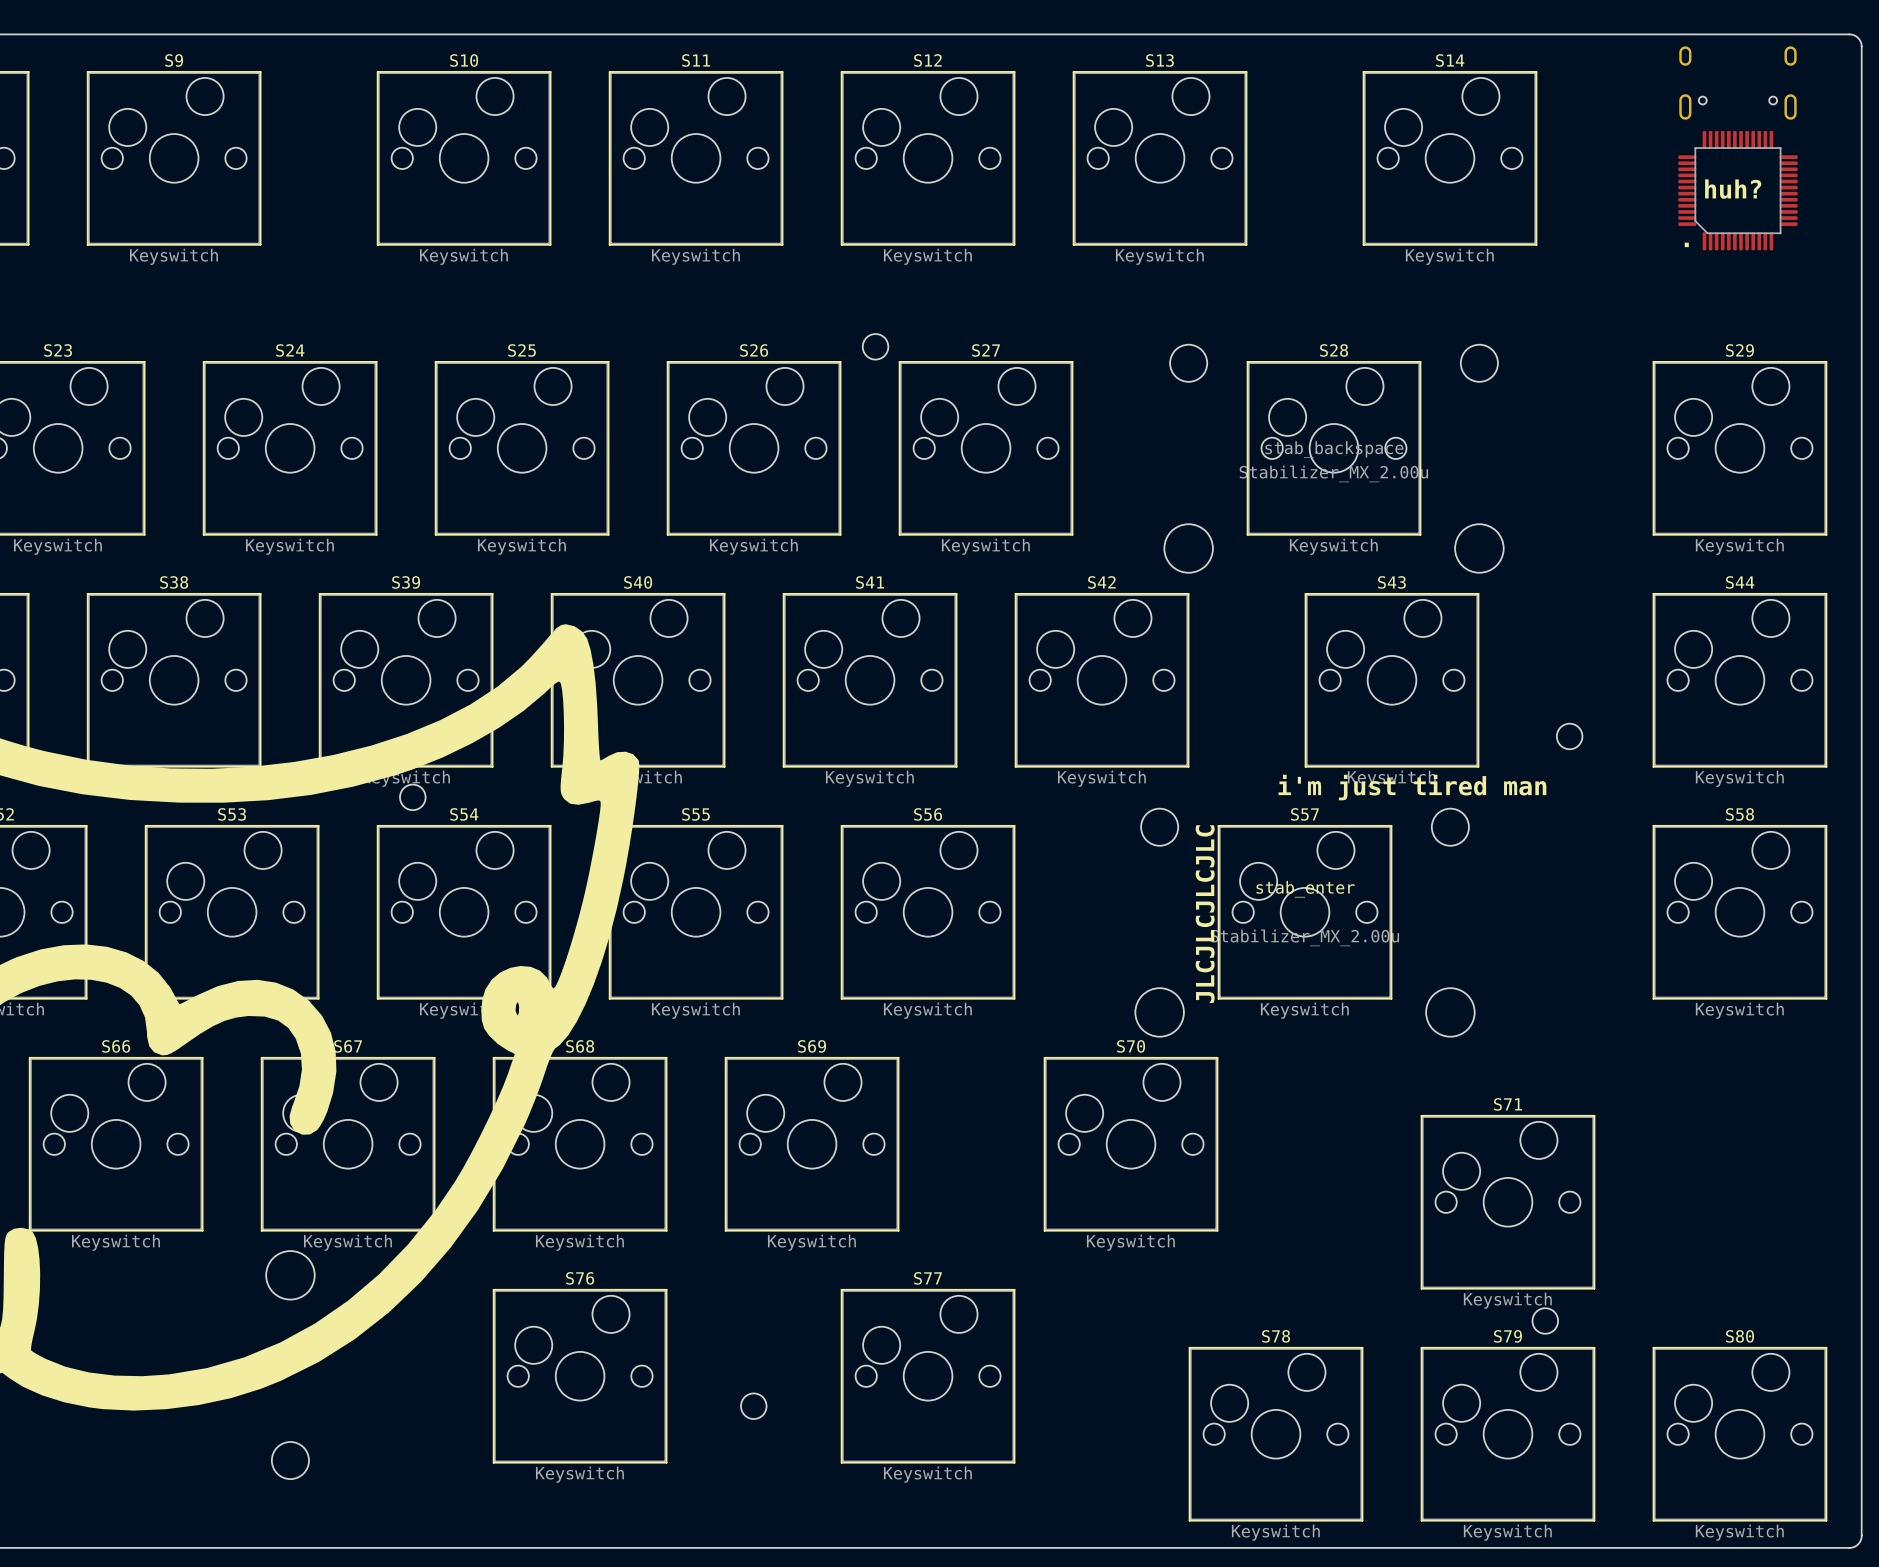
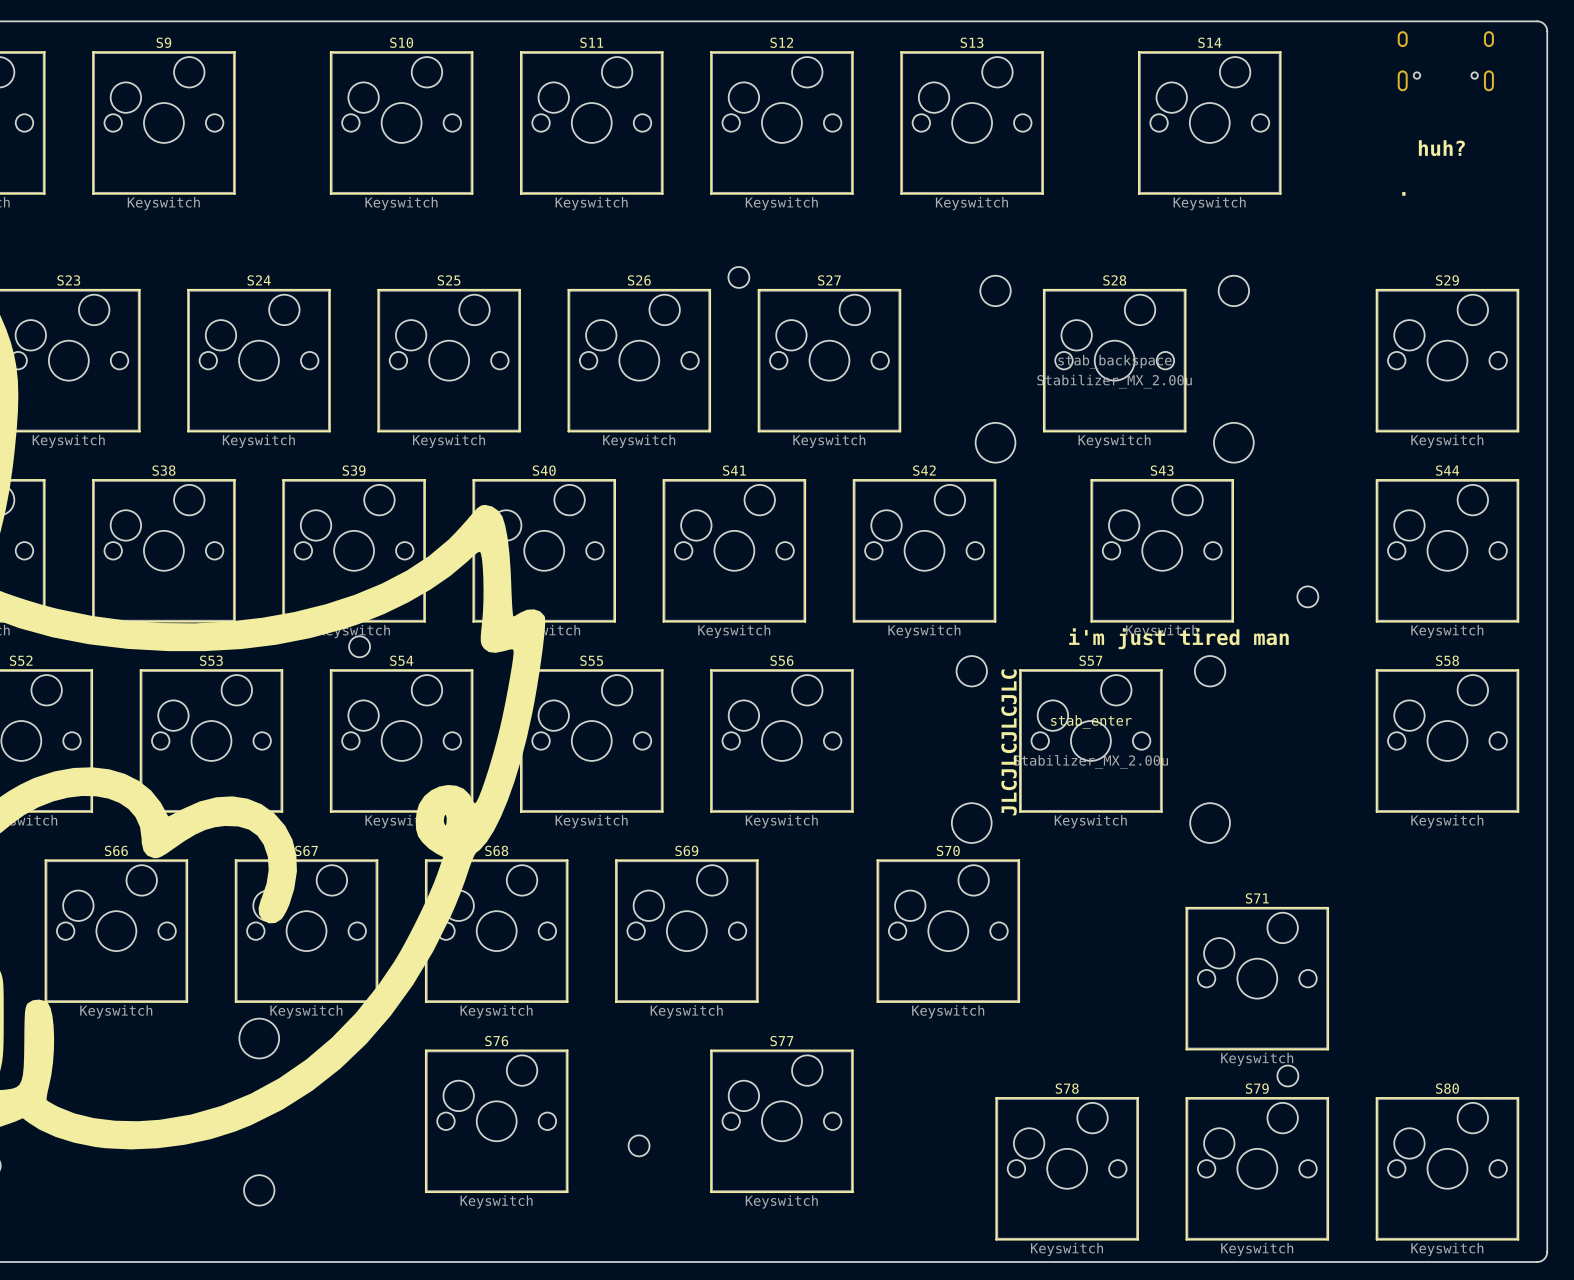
part: (1737, 190) -> none

